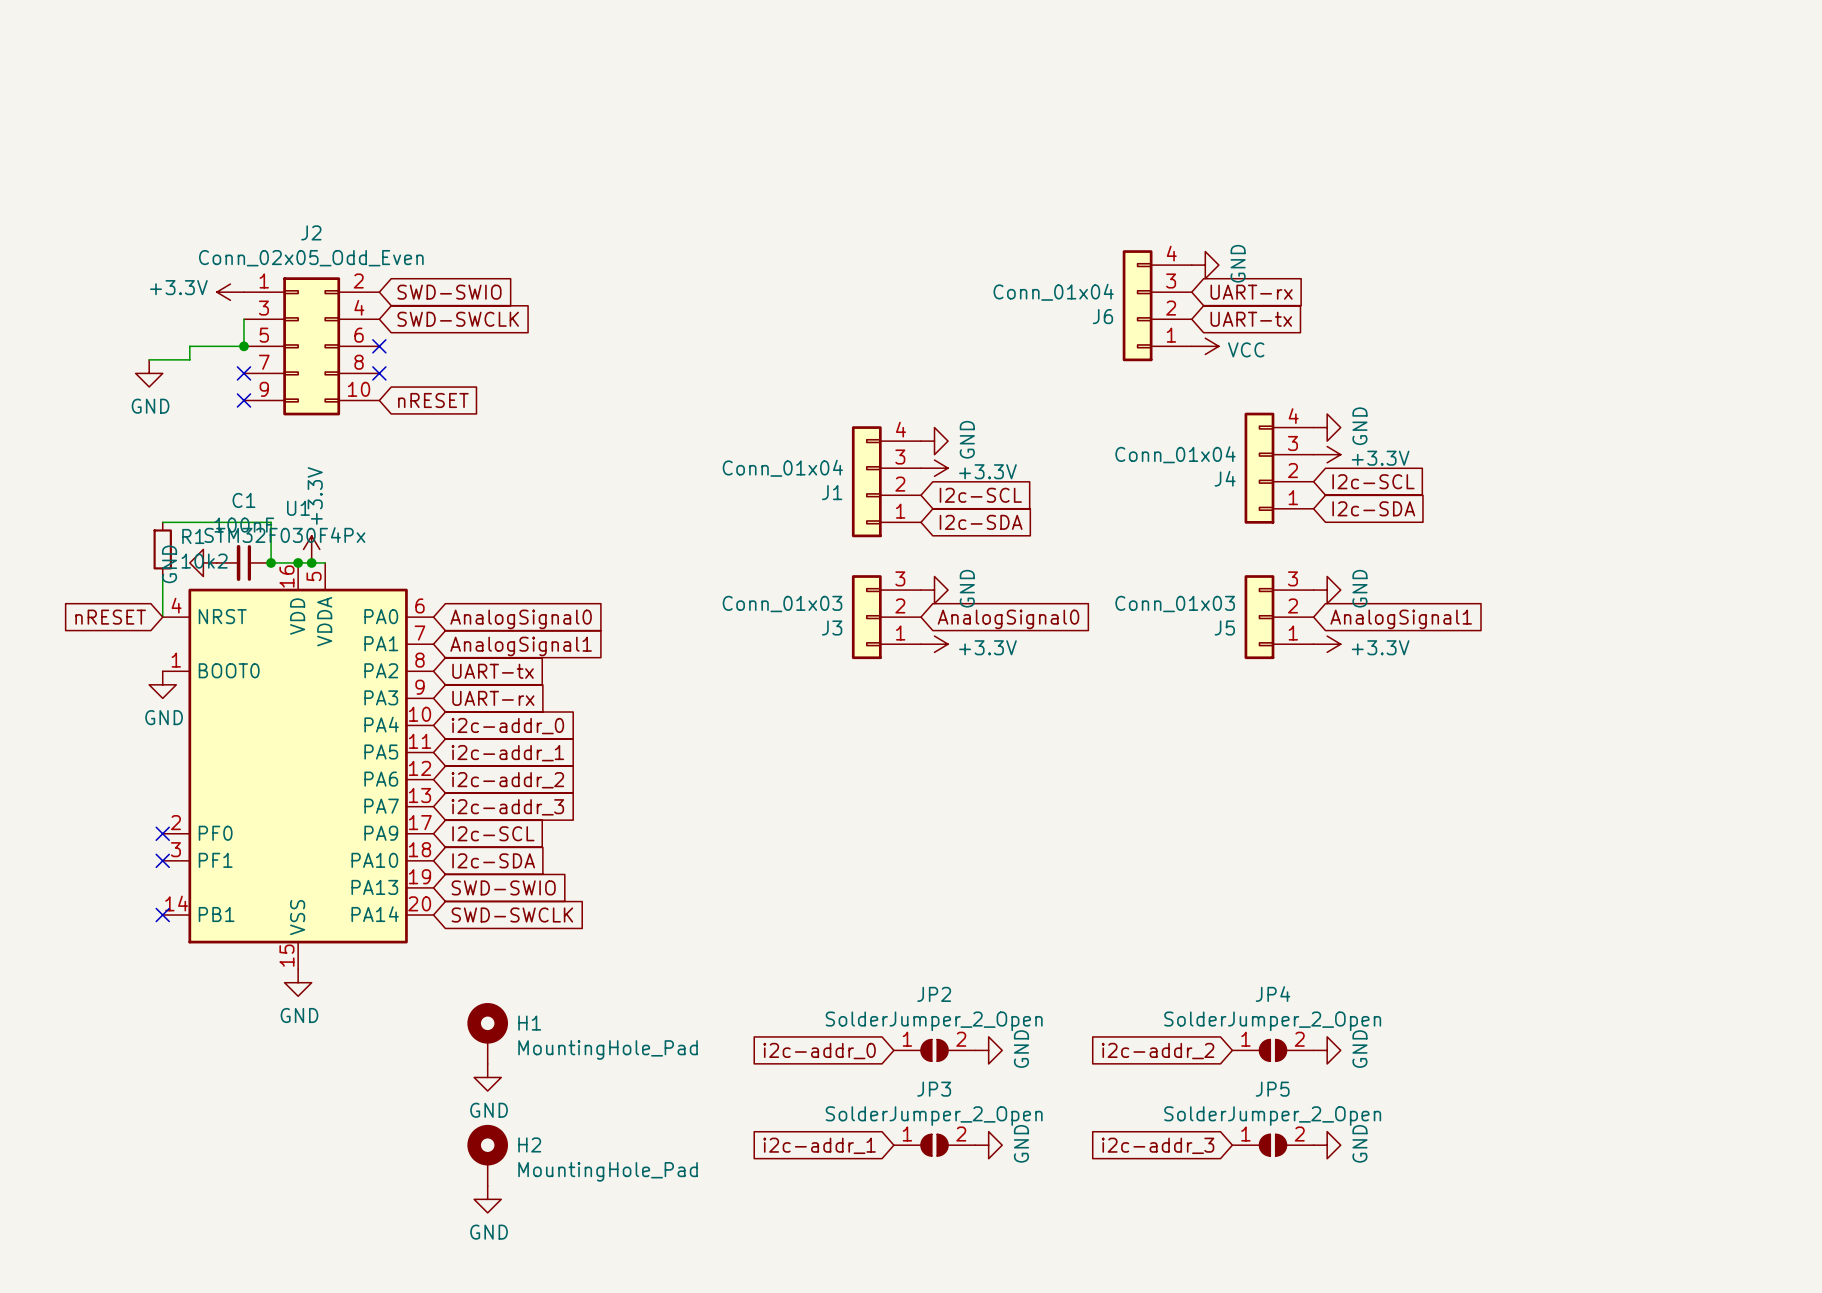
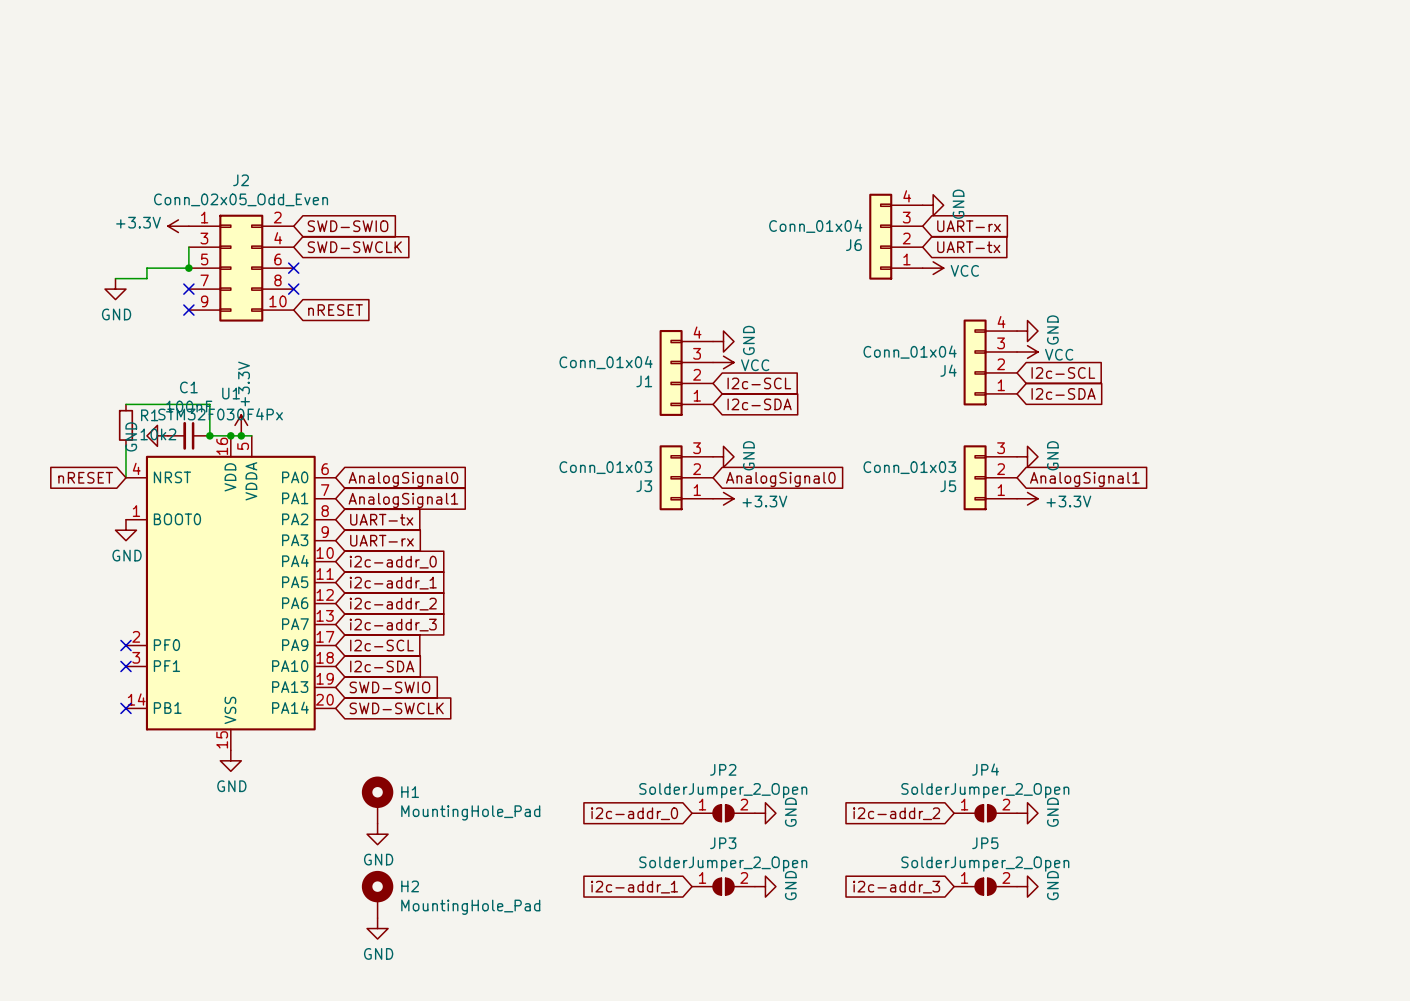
power symbol: +3.3V (1327, 454) -> VCC (1027, 352)
power symbol: +3.3V (934, 468) -> VCC (723, 362)

